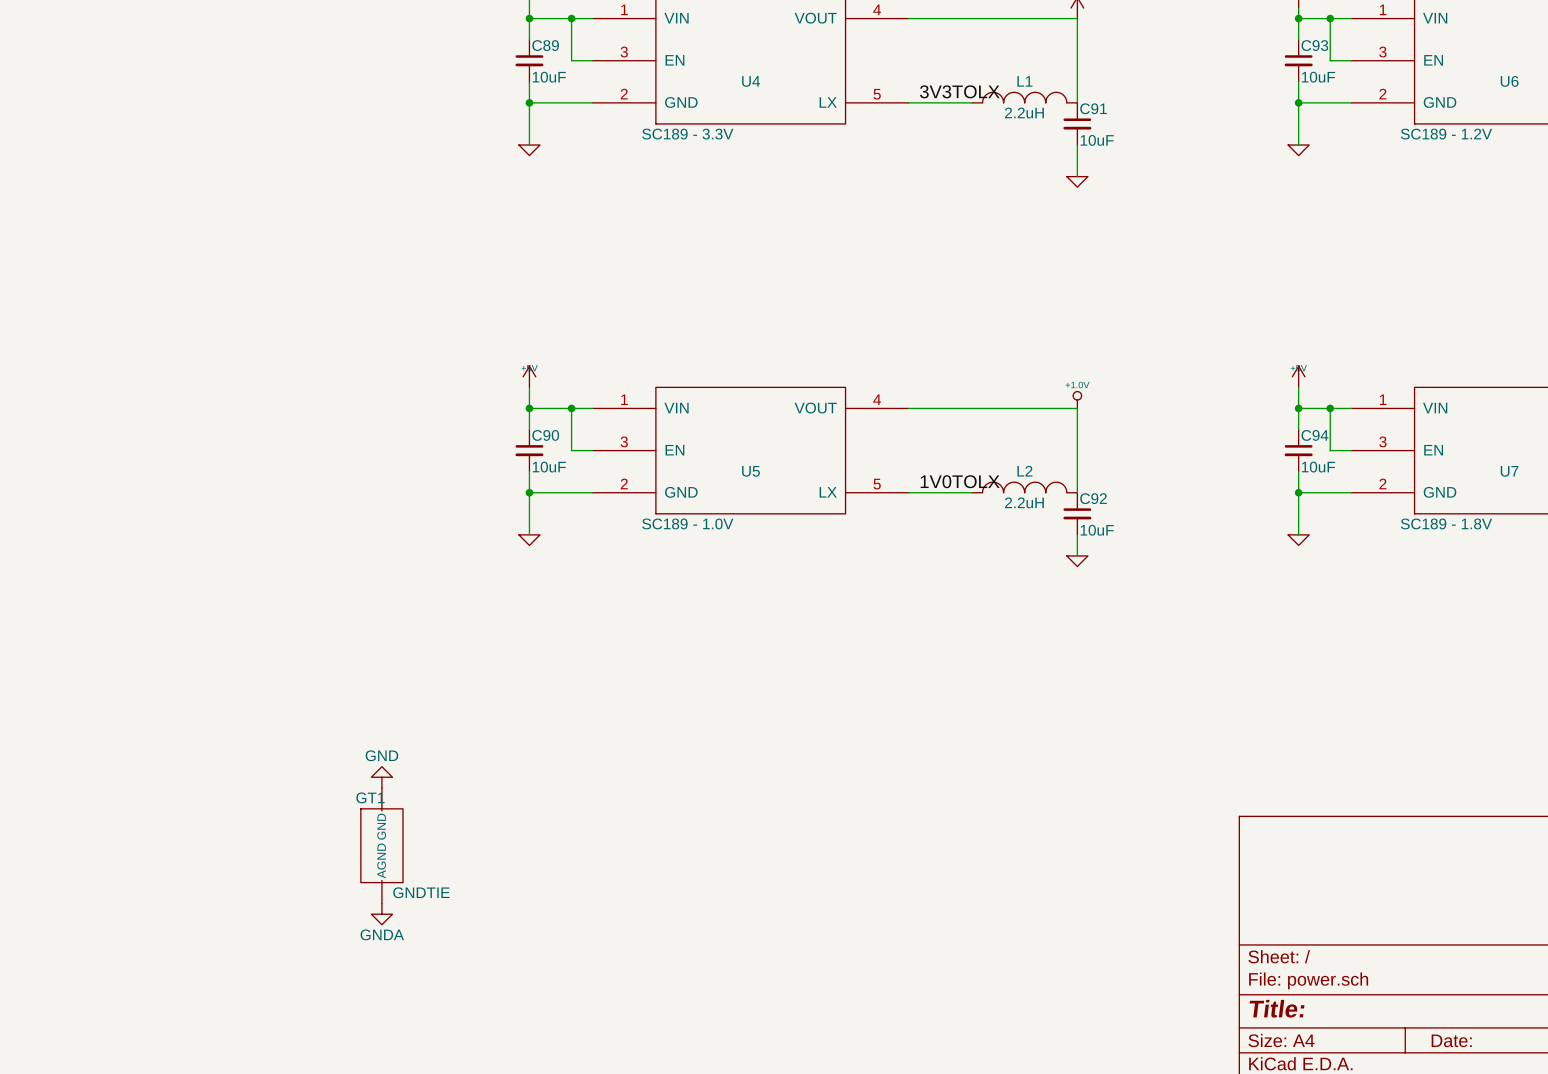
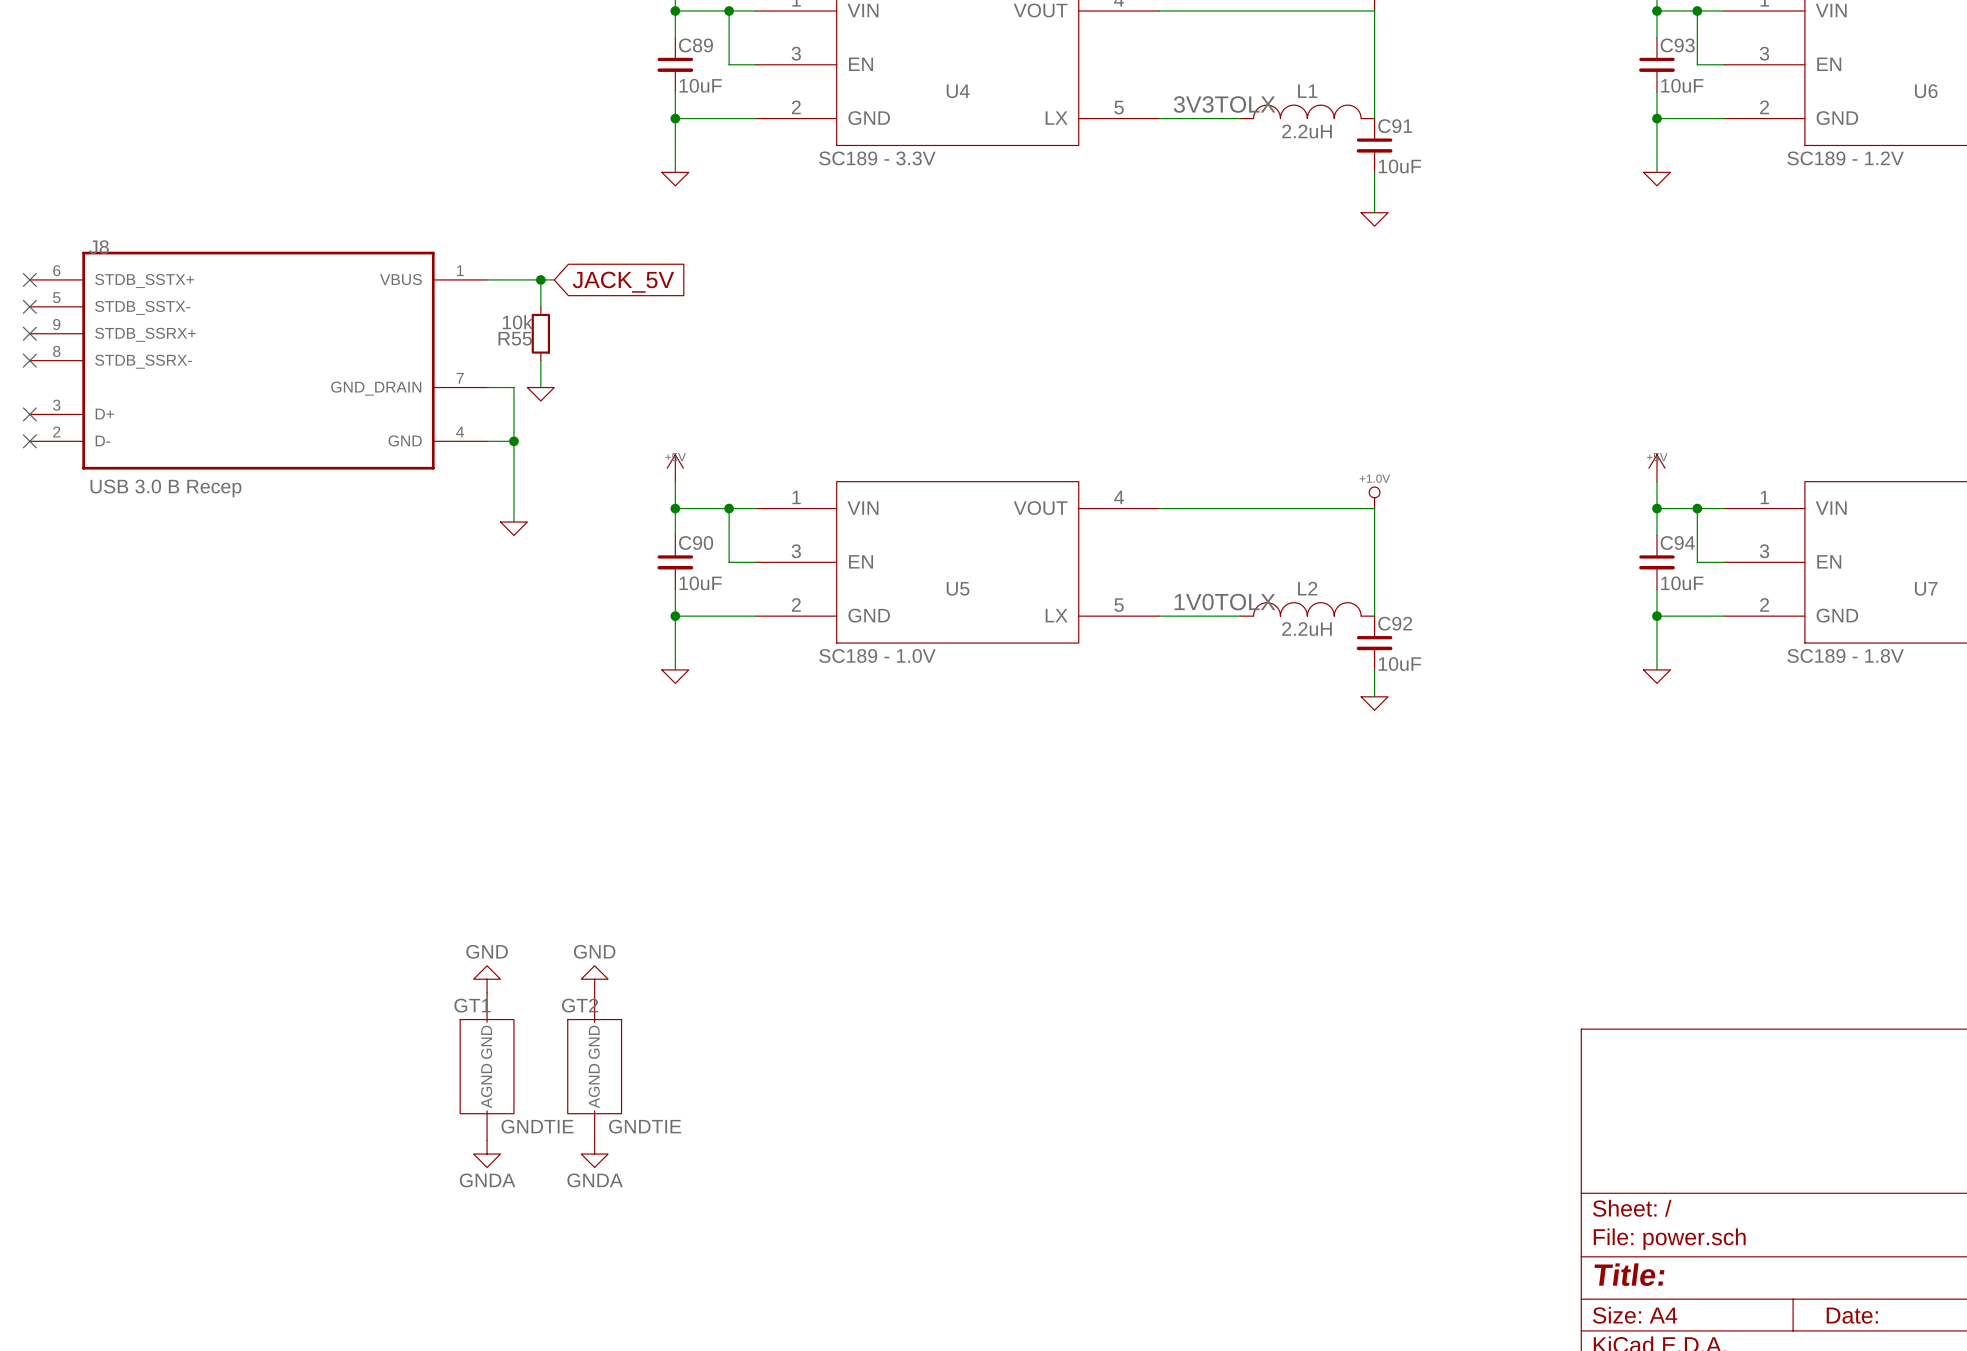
no-connect mark: none -> (29, 279)
wire: none -> (487, 279) (554, 279)
wire: none -> (540, 279) (540, 306)
junction: none -> (540, 279)
global label: none -> JACK_5V (623, 282)
no-connect mark: none -> (29, 306)
no-connect mark: none -> (29, 333)
R55: none -> 10k (540, 333)
no-connect mark: none -> (29, 360)
J8: none -> USB 3.0 B Recep (258, 360)
wire: none -> (540, 360) (540, 387)
wire: none -> (487, 387) (513, 387) (513, 522)
power symbol: none -> (540, 394)
no-connect mark: none -> (29, 414)
no-connect mark: none -> (29, 441)
wire: none -> (487, 441) (513, 441)
junction: none -> (513, 441)
power symbol: none -> (513, 528)
power symbol: none -> GND (594, 979)
GT2: none -> GNDTIE (594, 1066)
power symbol: none -> GNDA (594, 1154)

